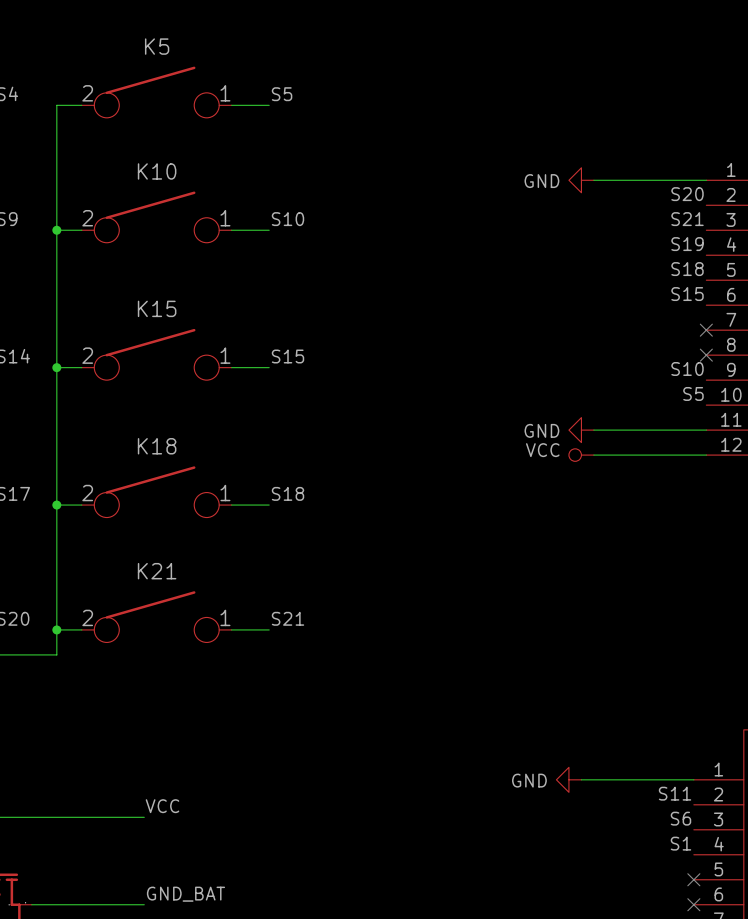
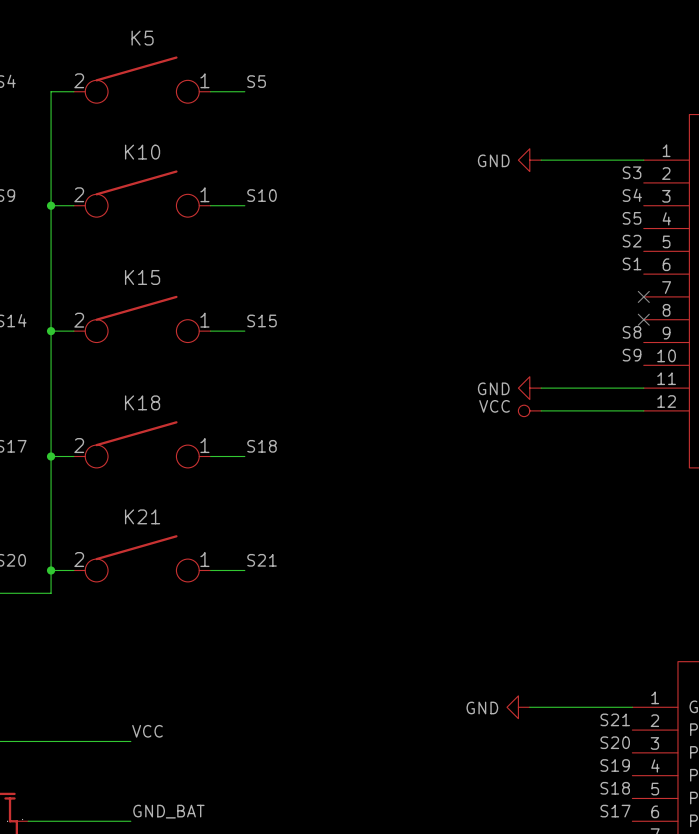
label: S20 (687, 194) -> S3 (632, 172)
label: S21 (687, 219) -> S4 (632, 195)
label: S19 (687, 244) -> S5 (632, 218)
label: S18 (687, 269) -> S2 (632, 241)
label: S15 (687, 294) -> S1 (632, 263)
label: S10 (687, 368) -> S8 (632, 332)
label: S5 (693, 393) -> S9 (632, 355)
label: S11 (675, 793) -> S21 (615, 719)
label: S6 (680, 818) -> S20 (615, 742)
label: S1 (680, 843) -> S19 (615, 765)
label: none -> S18 (615, 788)
no-connect mark: (693, 879) -> none
label: none -> S17 (615, 811)
no-connect mark: (693, 904) -> none

